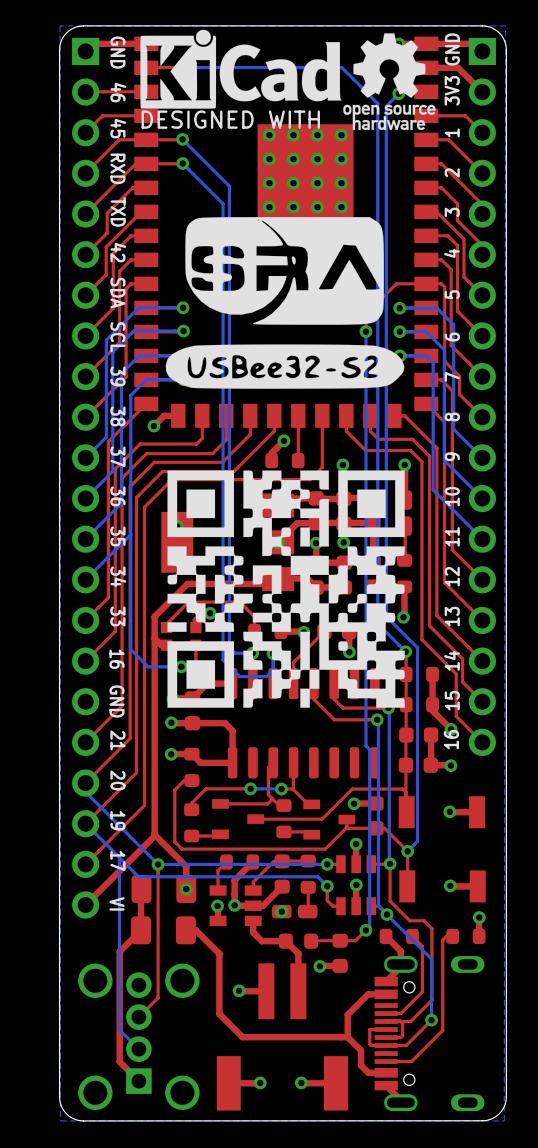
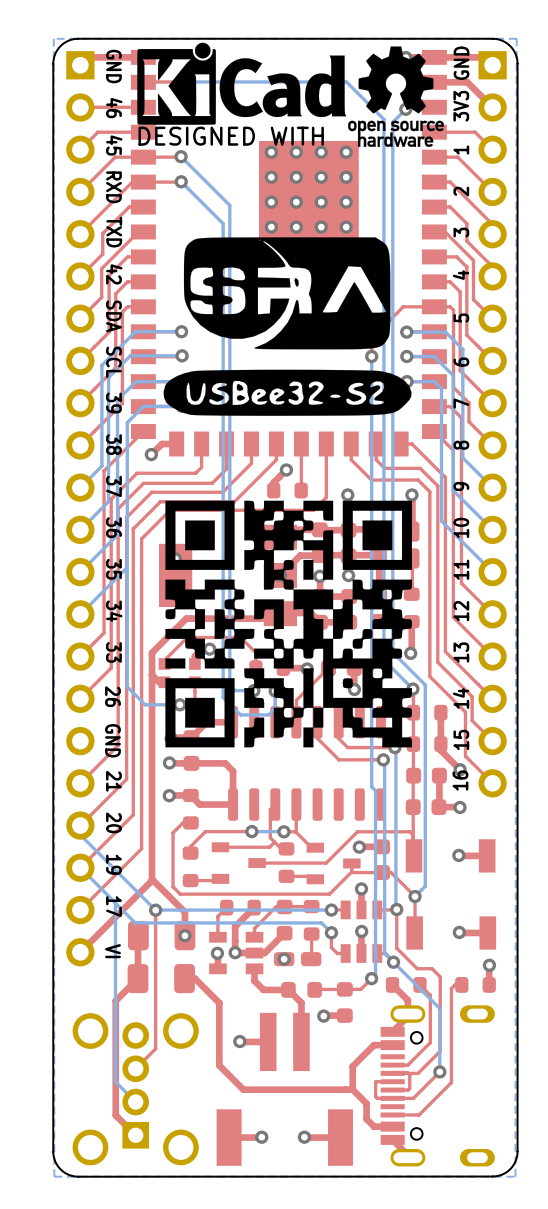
text: 16 (117, 659) -> 26 (112, 696)

